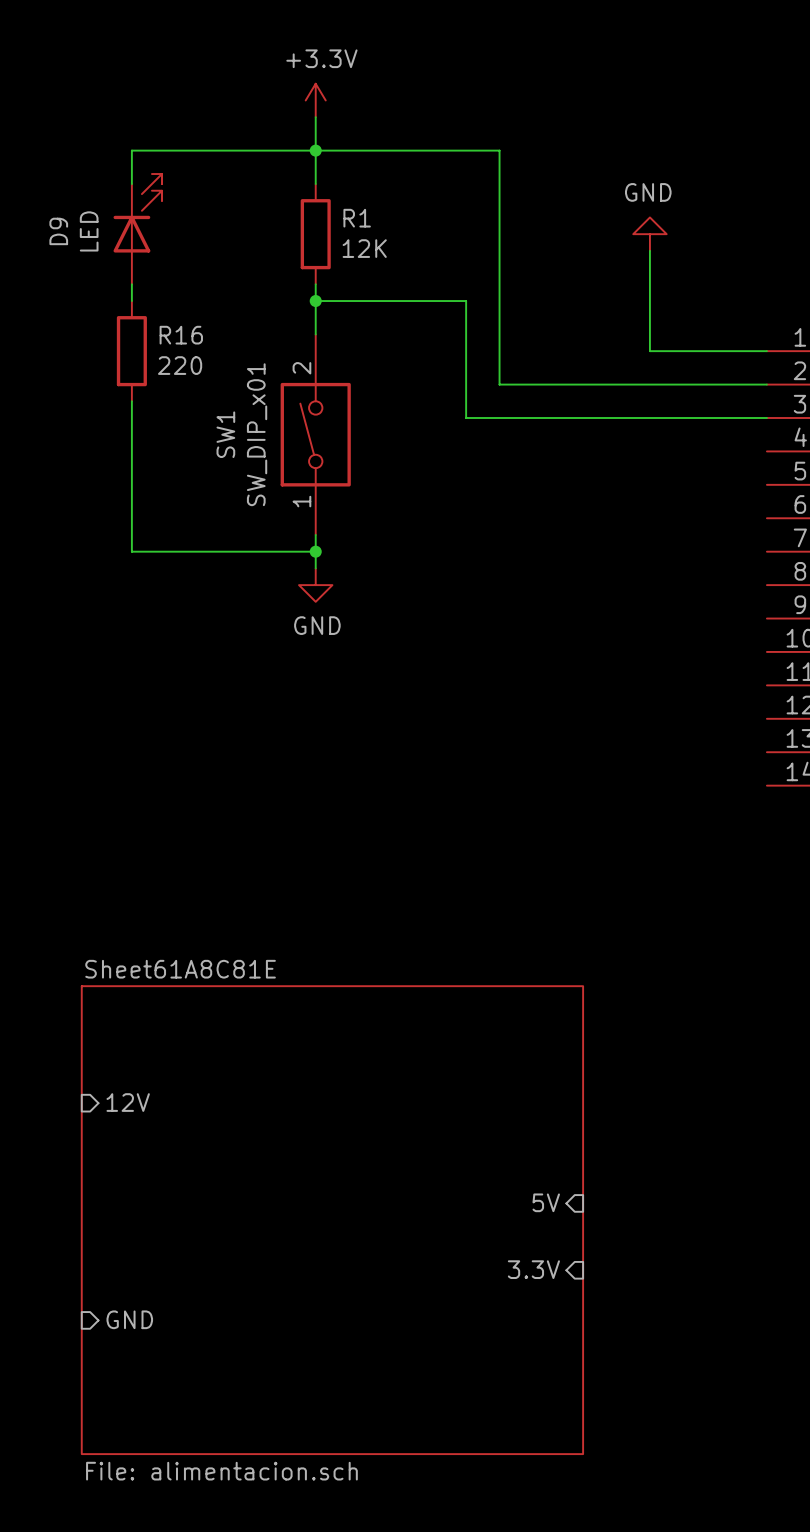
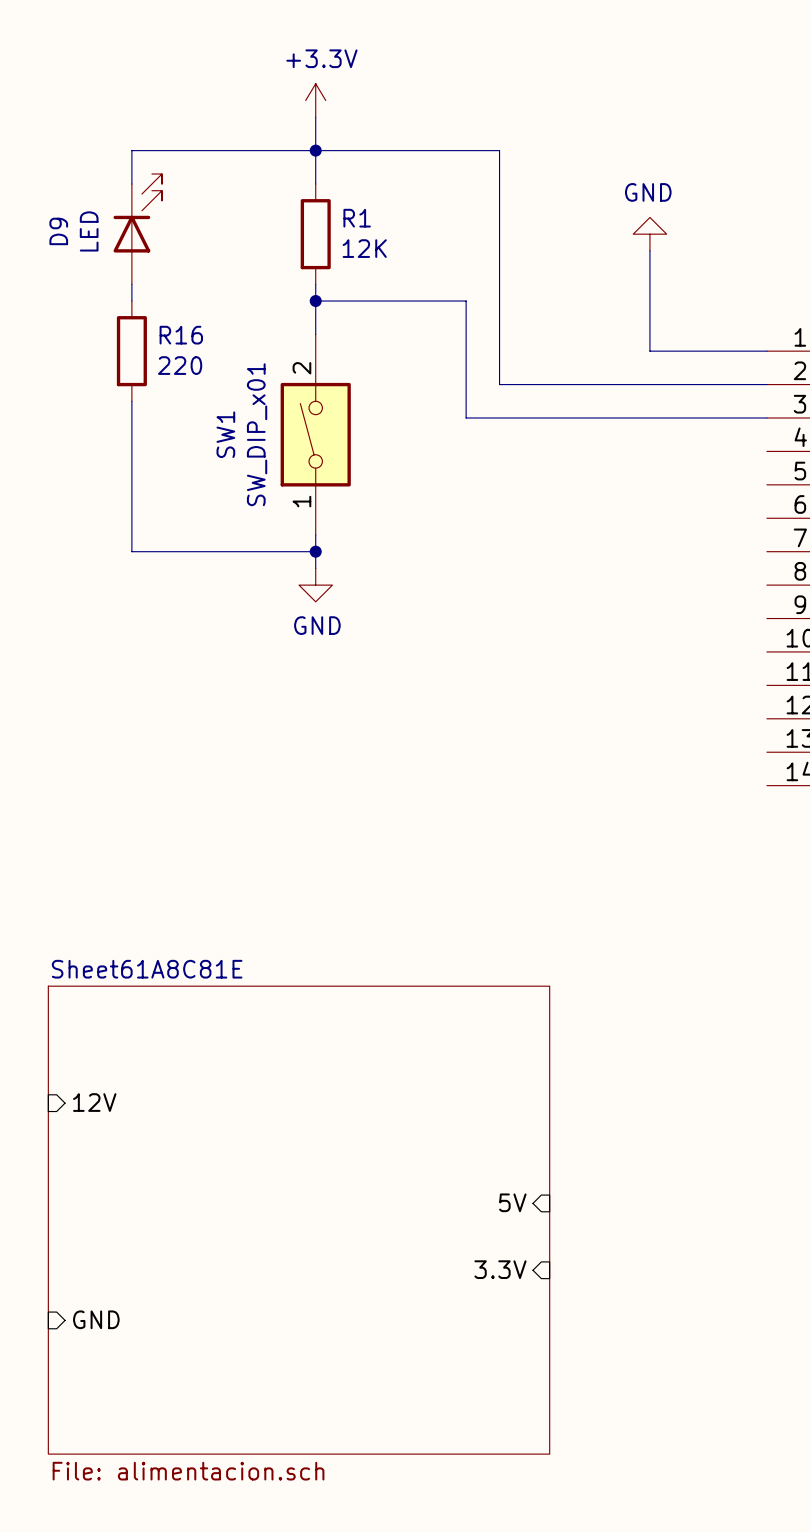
sheet pin position: 12V (128, 1102) -> 12V (94, 1102)
sheet pin position: 5V (546, 1202) -> 5V (512, 1202)
sheet Sheet61A8C81E position: (332, 1220) -> (299, 1220)
sheet pin position: 3.3V (533, 1269) -> 3.3V (500, 1269)
sheet pin position: GND (129, 1319) -> GND (96, 1319)

